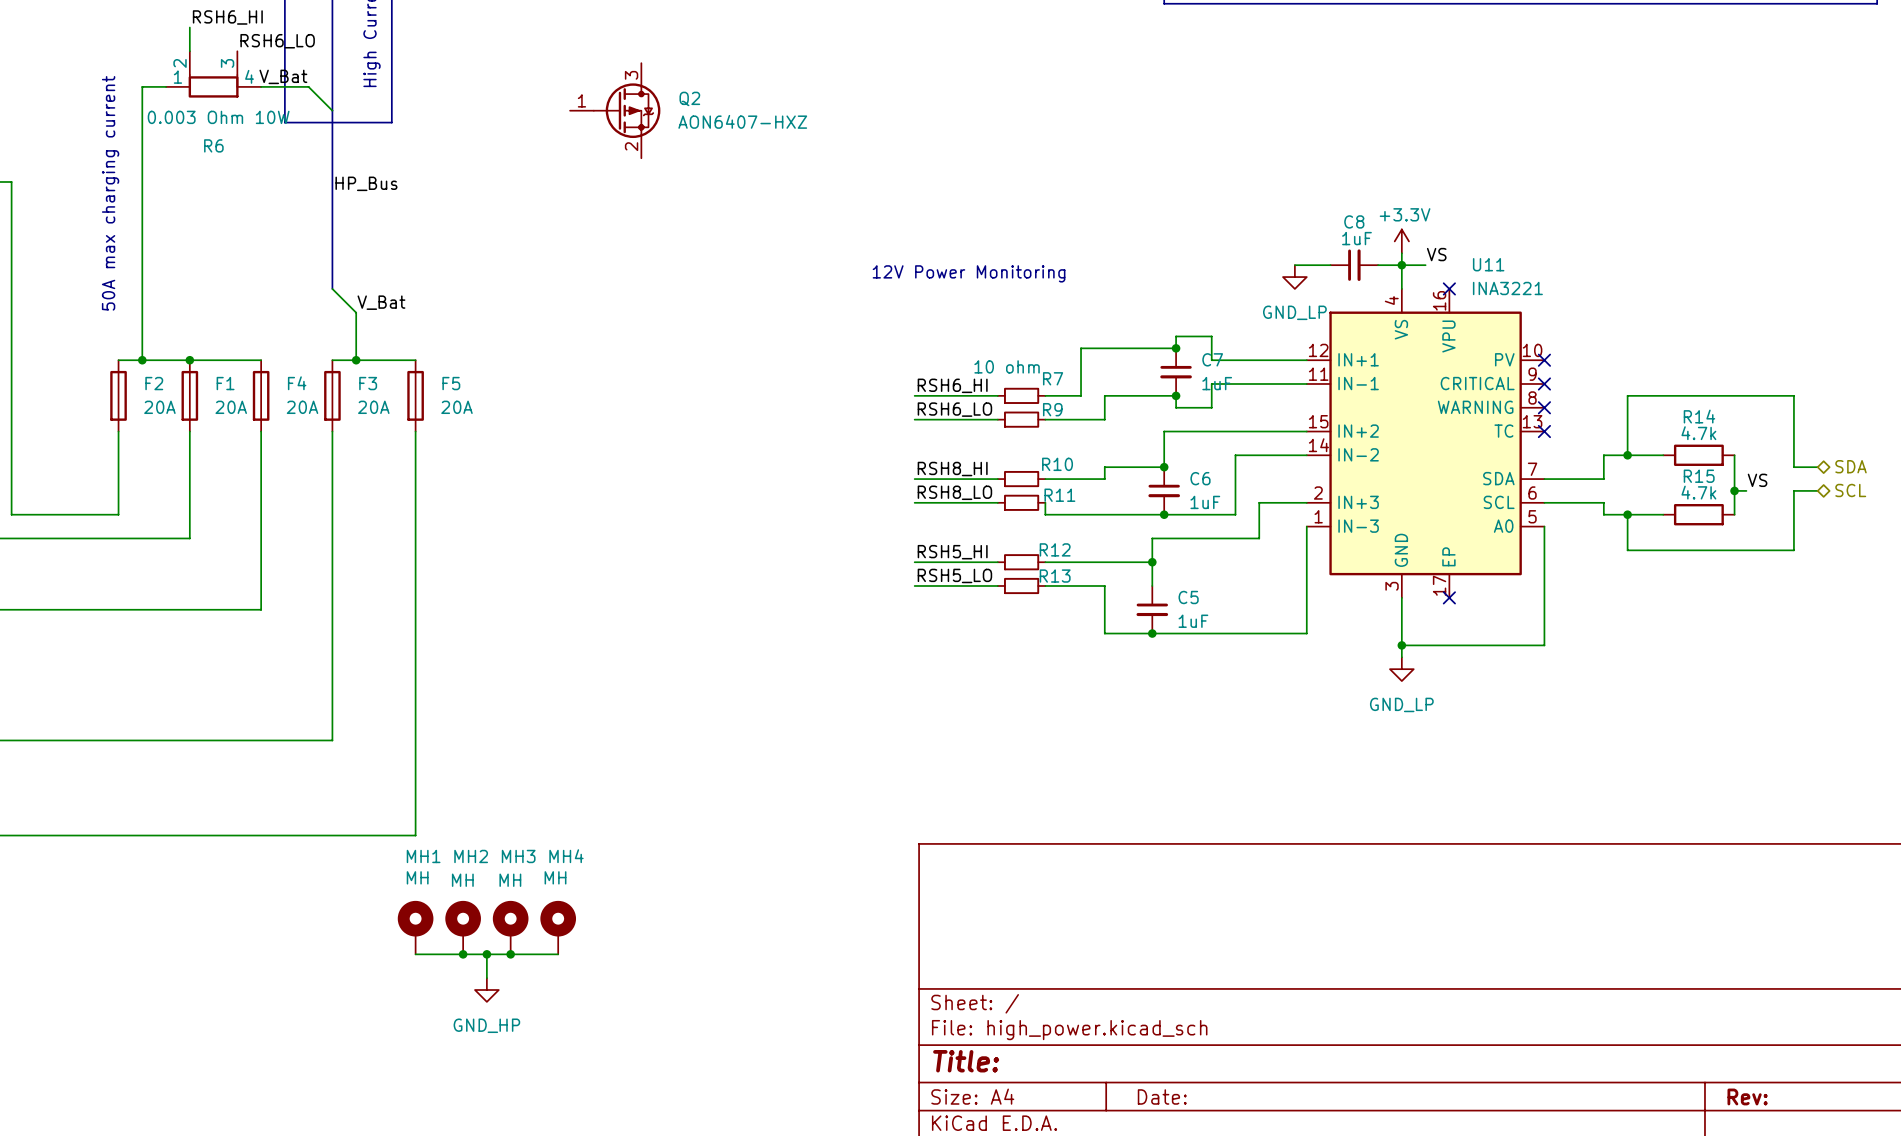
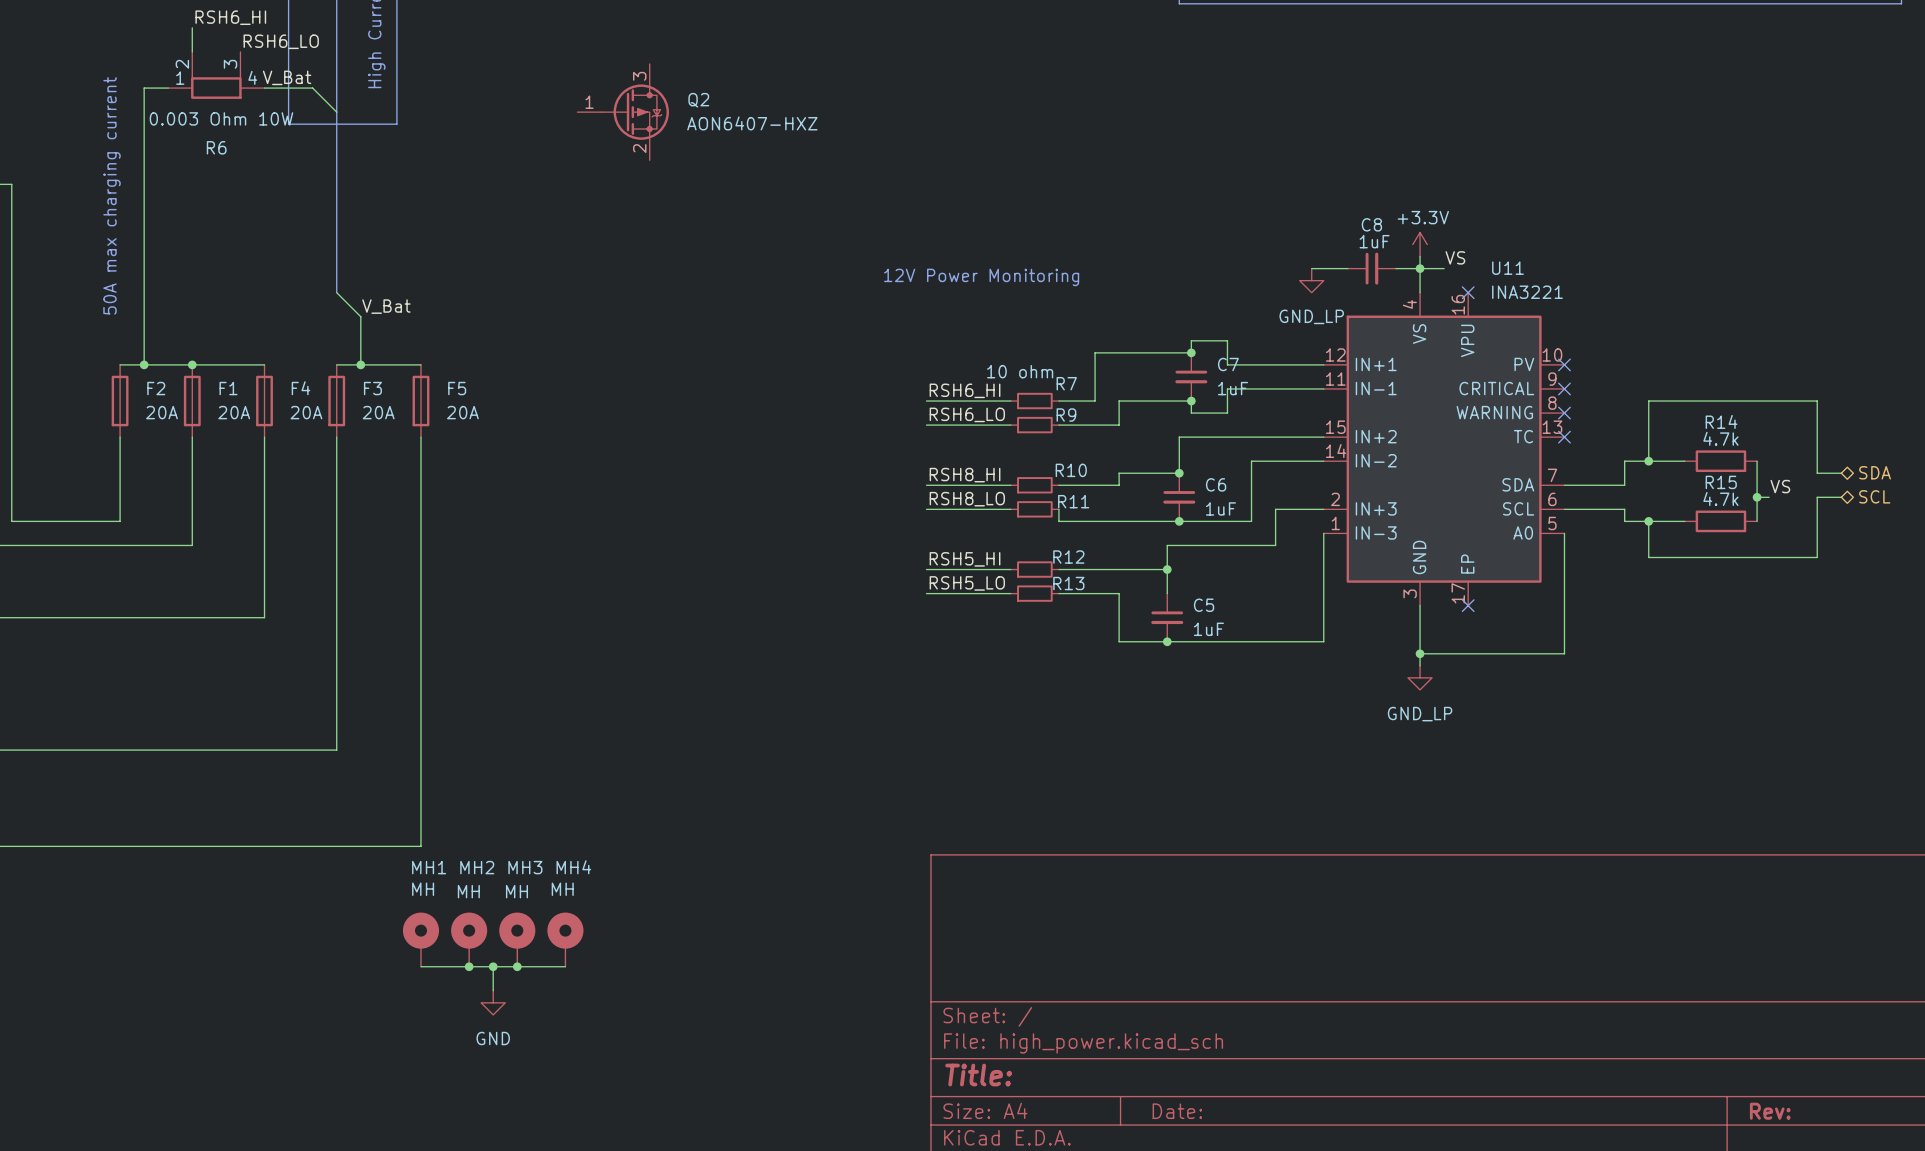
label: HP_Bus (366, 183) -> none
power symbol: GND_HP (486, 990) -> GND (493, 1002)

